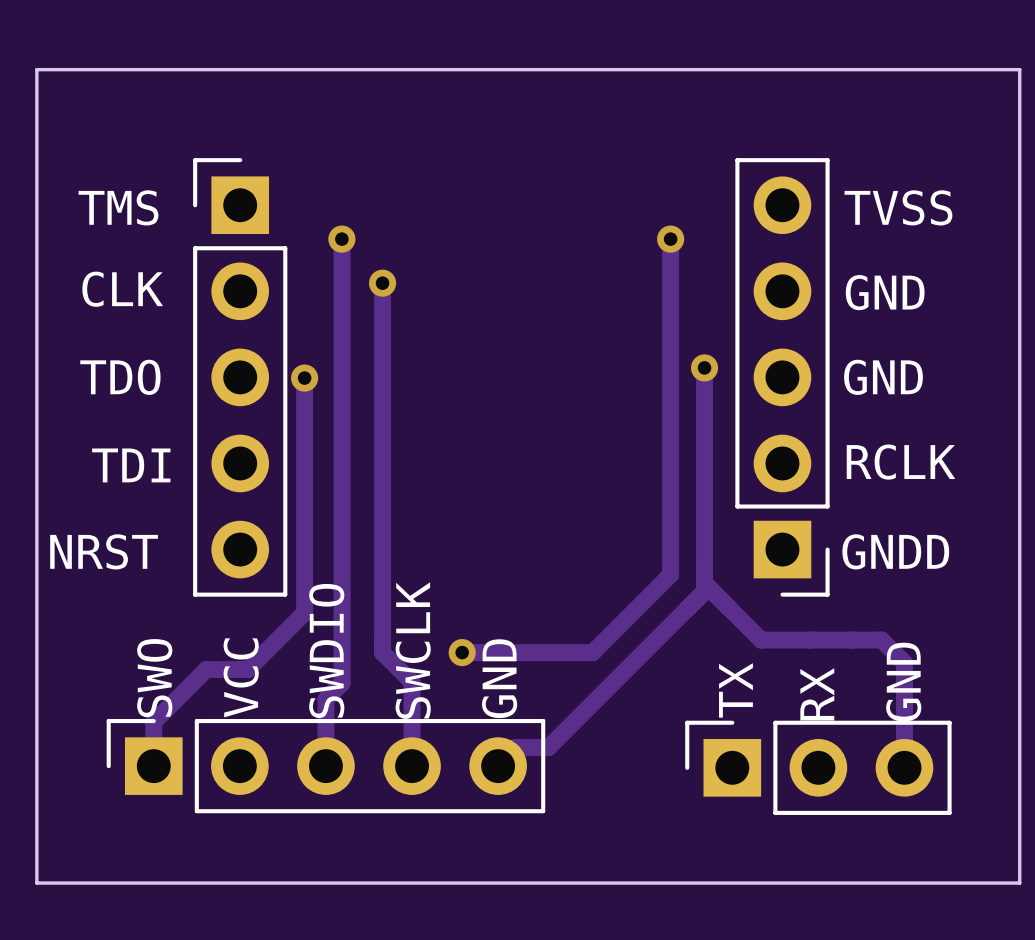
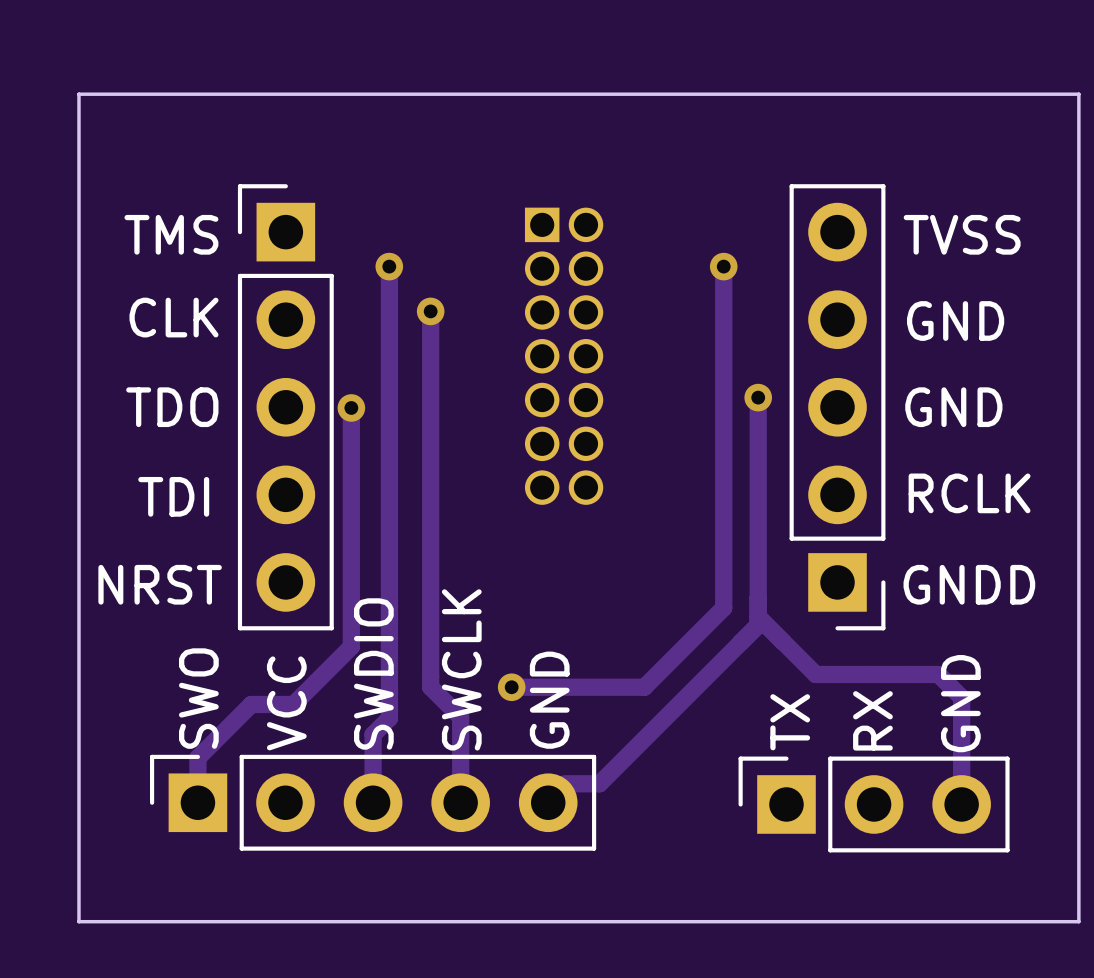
part: none -> (564, 356)

